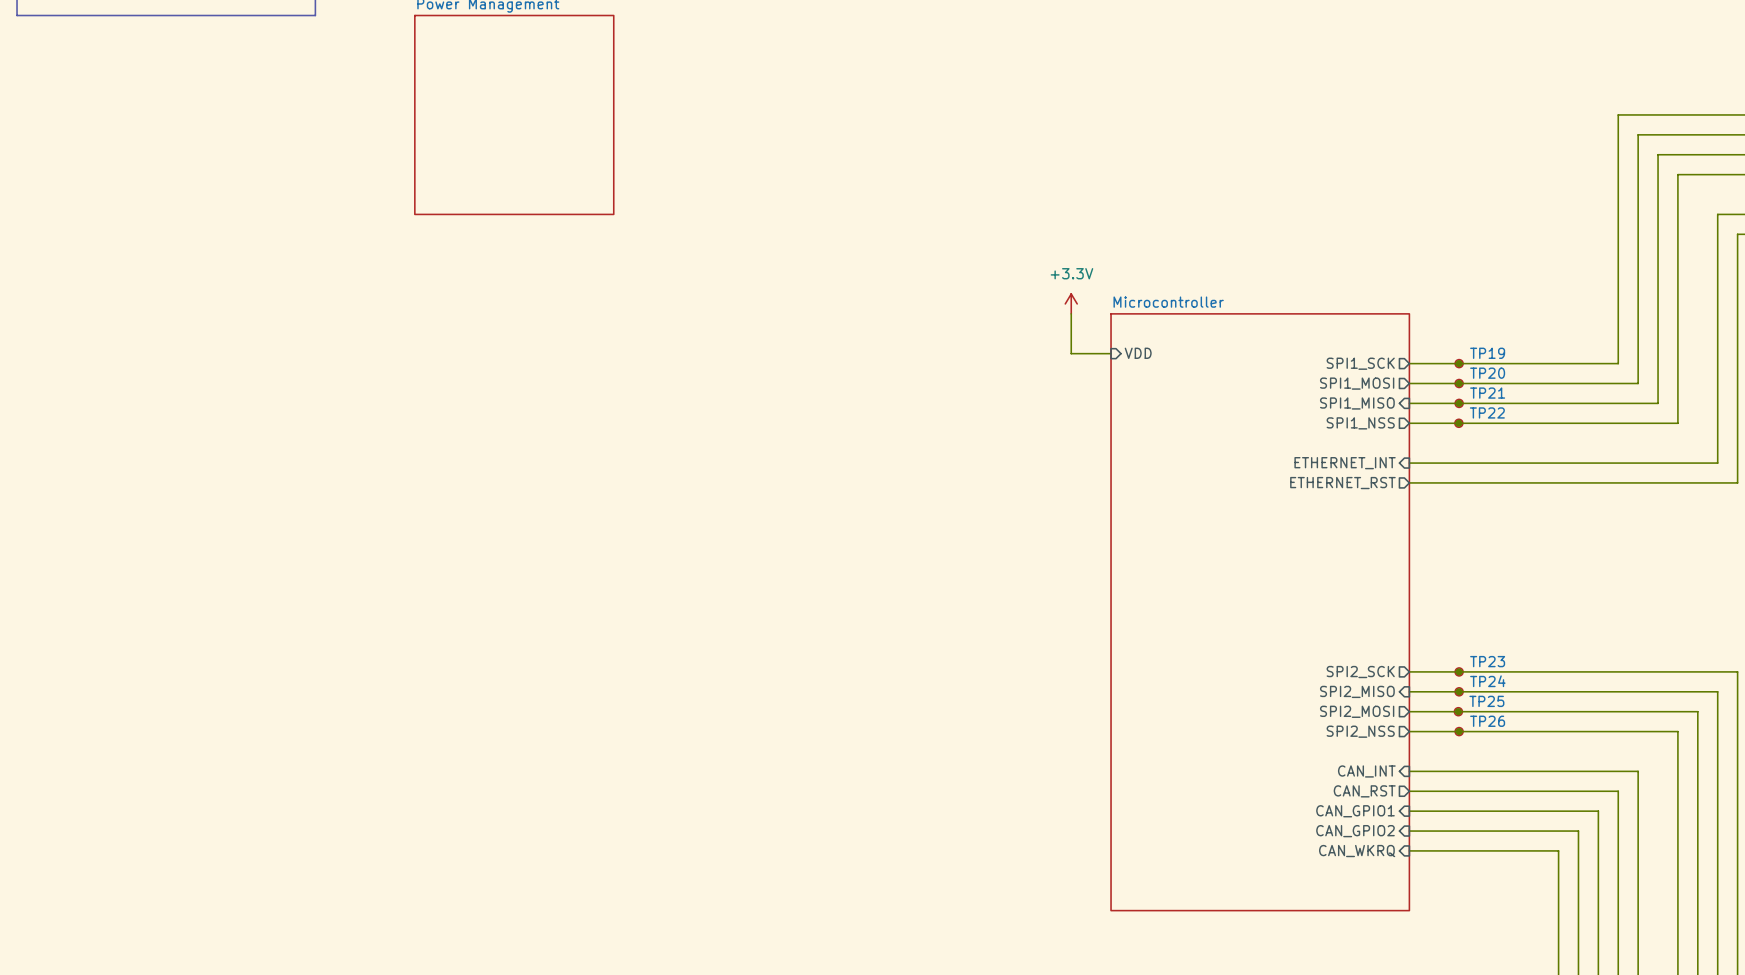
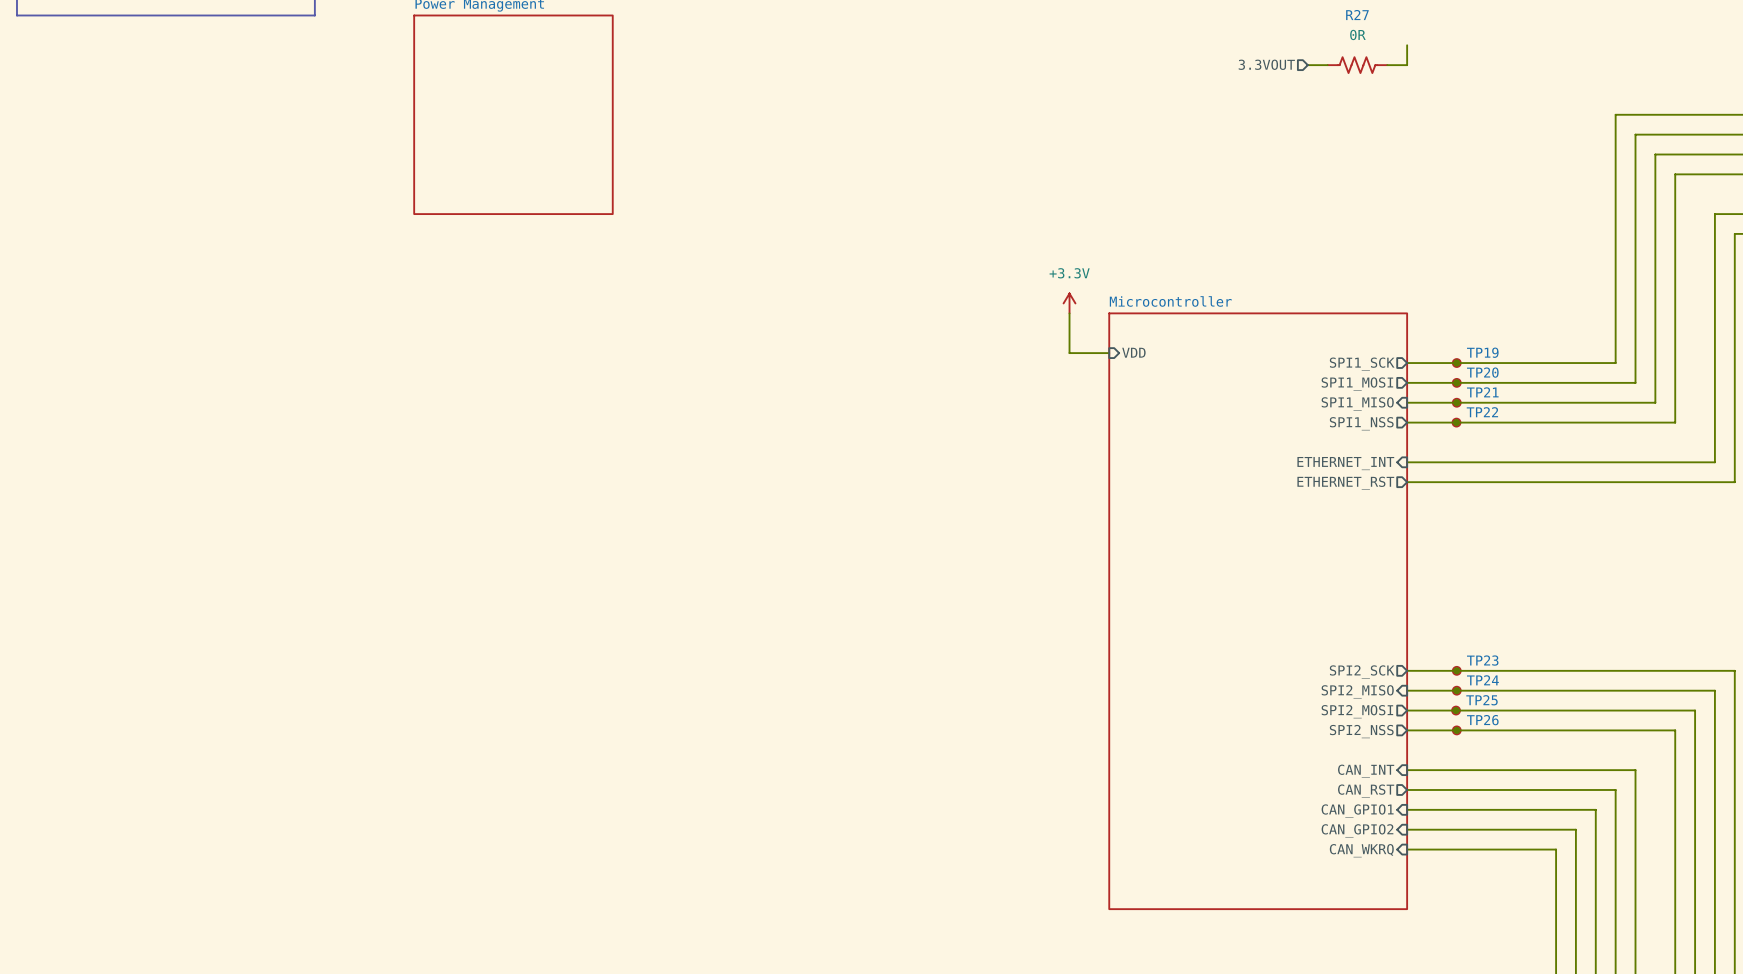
wire: none -> (1407, 45) (1407, 65) (1387, 65)
sheet pin: none -> 3.3VOUT (1266, 64)
wire: none -> (1307, 65) (1327, 65)
R27: none -> 0R (1357, 65)

